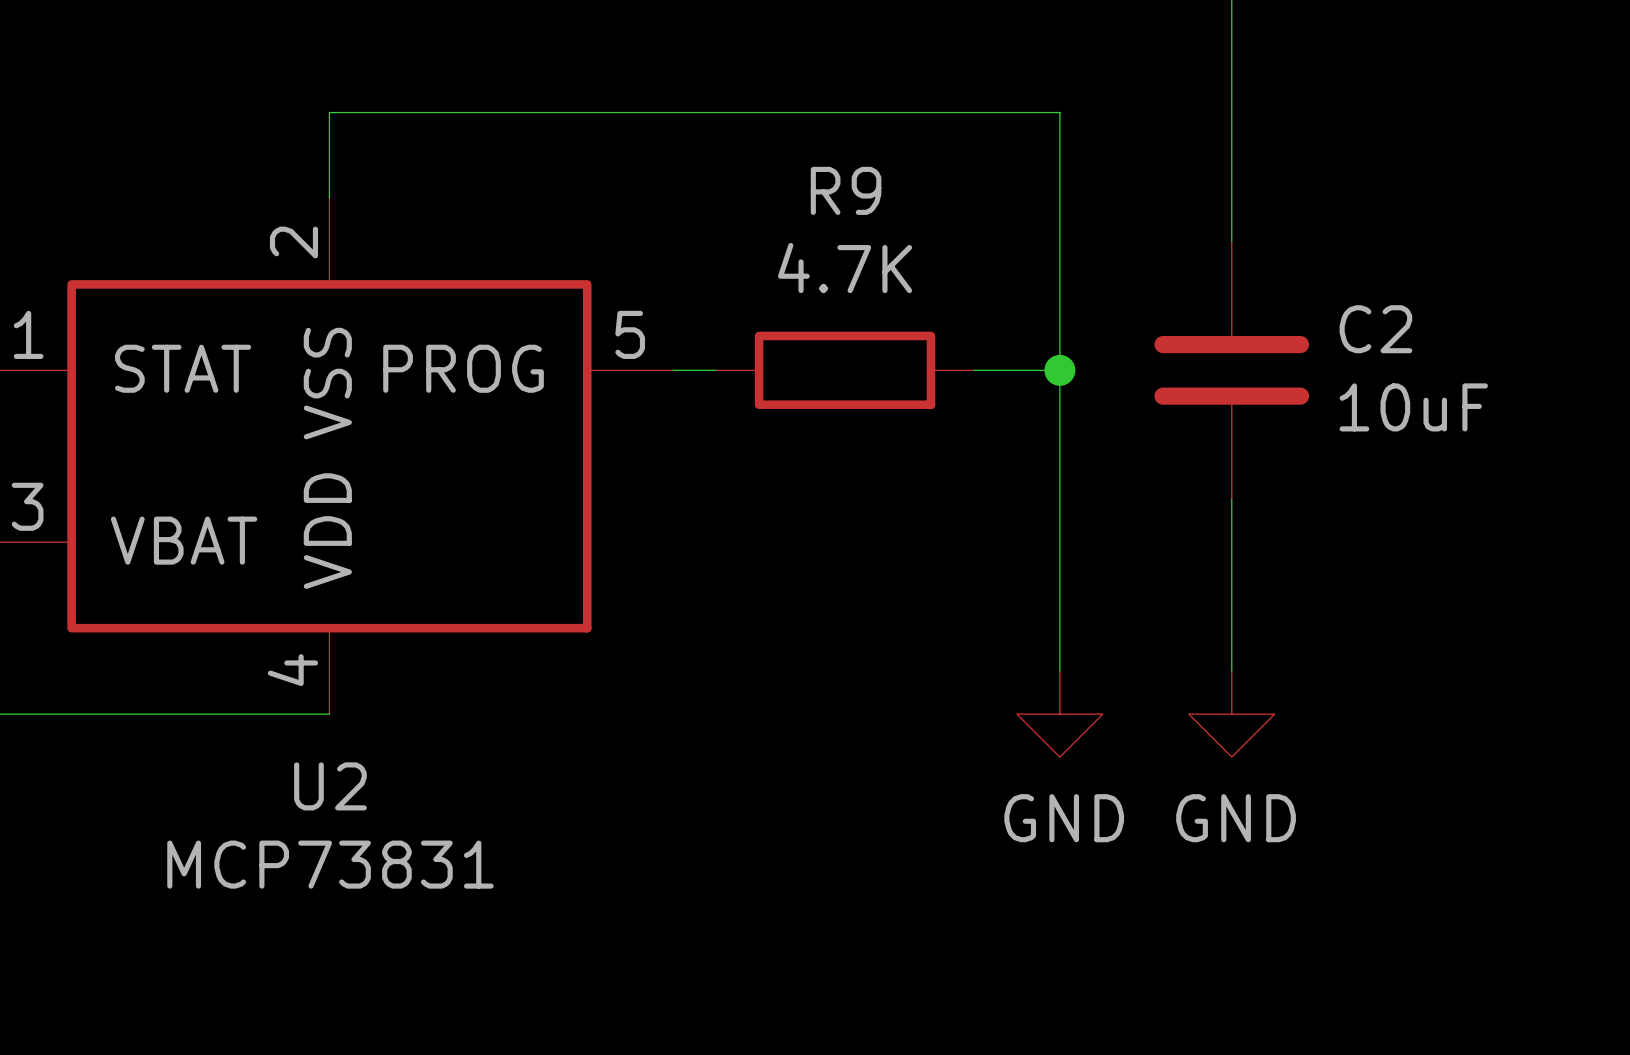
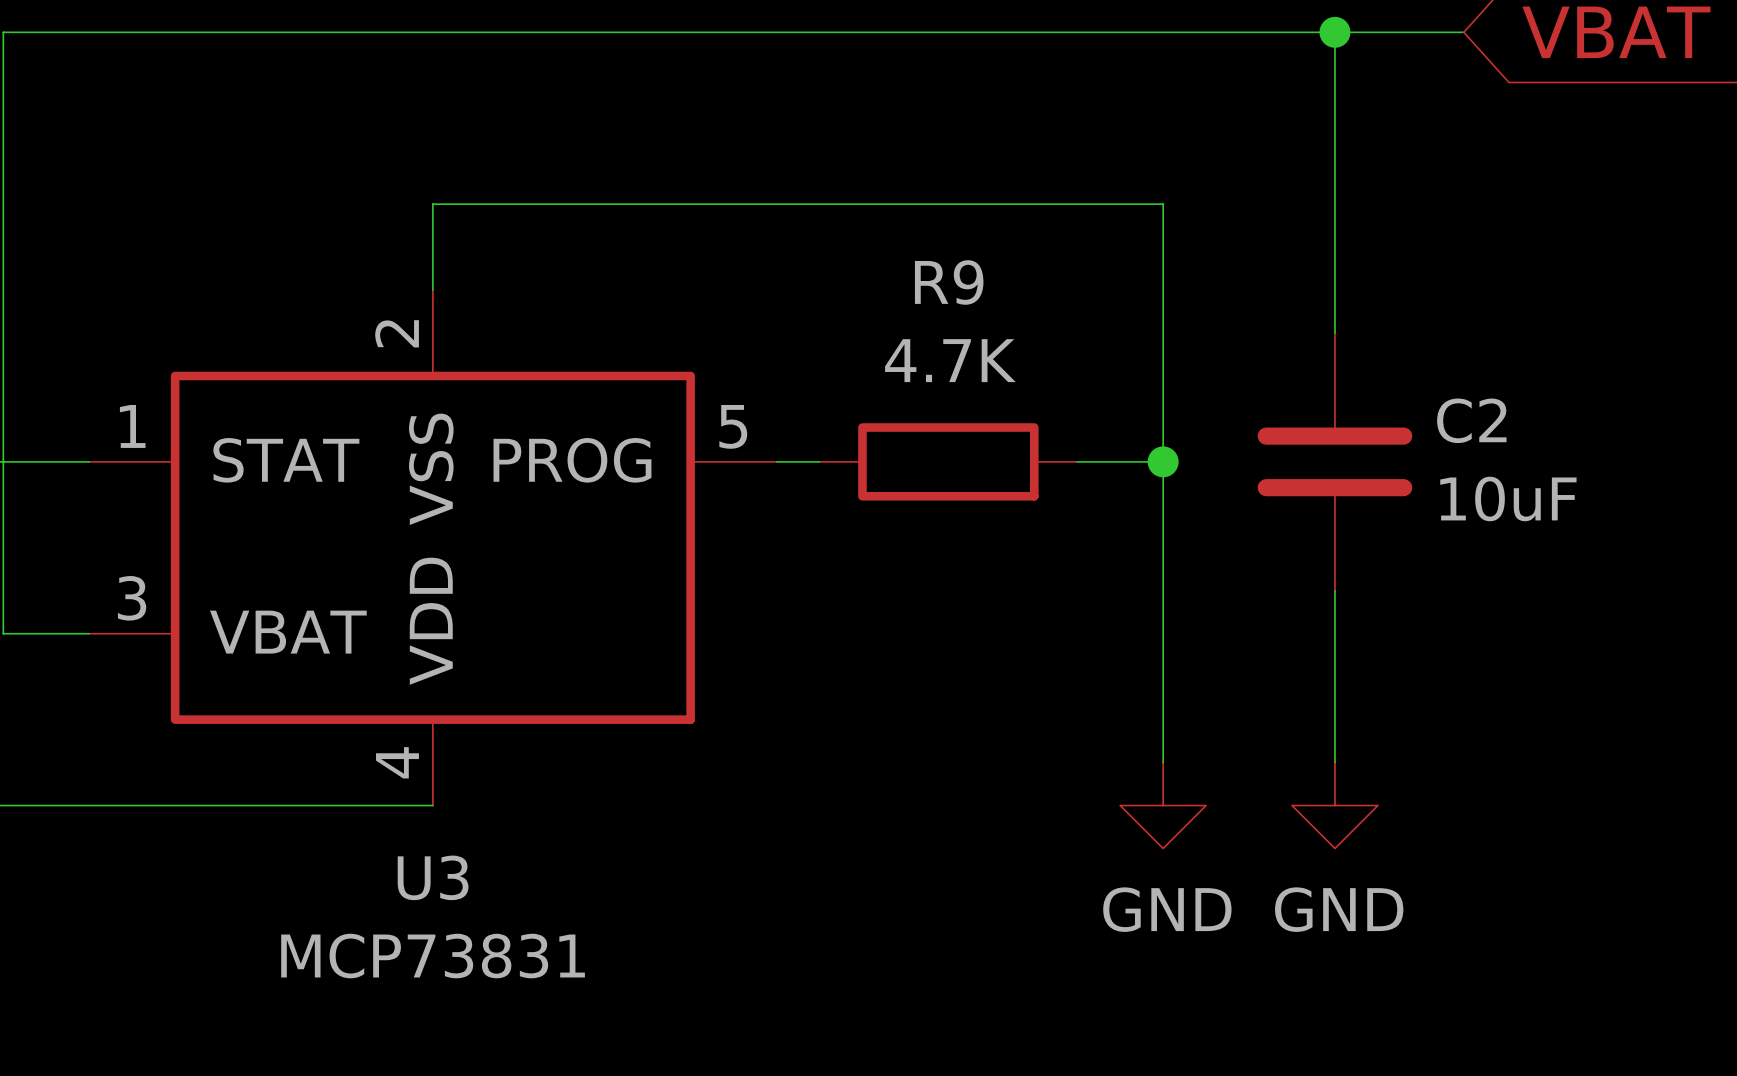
U2 name: U2 (330, 786) -> U3 (433, 877)

